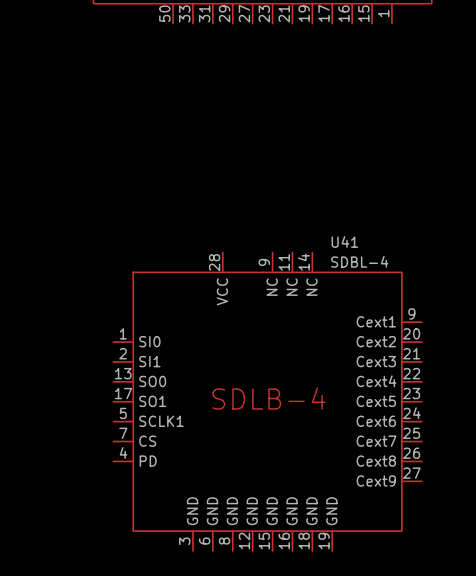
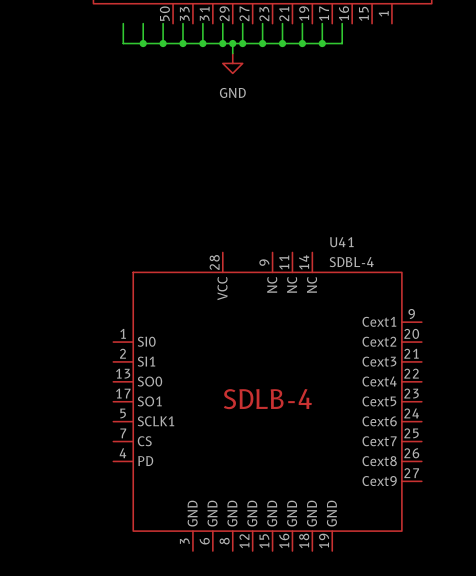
wire: none -> (123, 23) (123, 43) (342, 43) (342, 23)
wire: none -> (143, 23) (143, 43)
wire: none -> (163, 23) (163, 43)
wire: none -> (182, 23) (182, 43)
wire: none -> (202, 23) (202, 43)
wire: none -> (222, 23) (222, 43)
wire: none -> (242, 23) (242, 43)
wire: none -> (262, 23) (262, 43)
wire: none -> (282, 23) (282, 43)
wire: none -> (302, 23) (302, 43)
wire: none -> (322, 23) (322, 43)
junction: none -> (143, 43)
junction: none -> (163, 43)
junction: none -> (182, 43)
junction: none -> (202, 43)
junction: none -> (222, 43)
wire: none -> (232, 43) (232, 53)
junction: none -> (232, 43)
junction: none -> (242, 43)
junction: none -> (262, 43)
junction: none -> (282, 43)
junction: none -> (302, 43)
junction: none -> (322, 43)
power symbol: none -> GND (232, 63)

